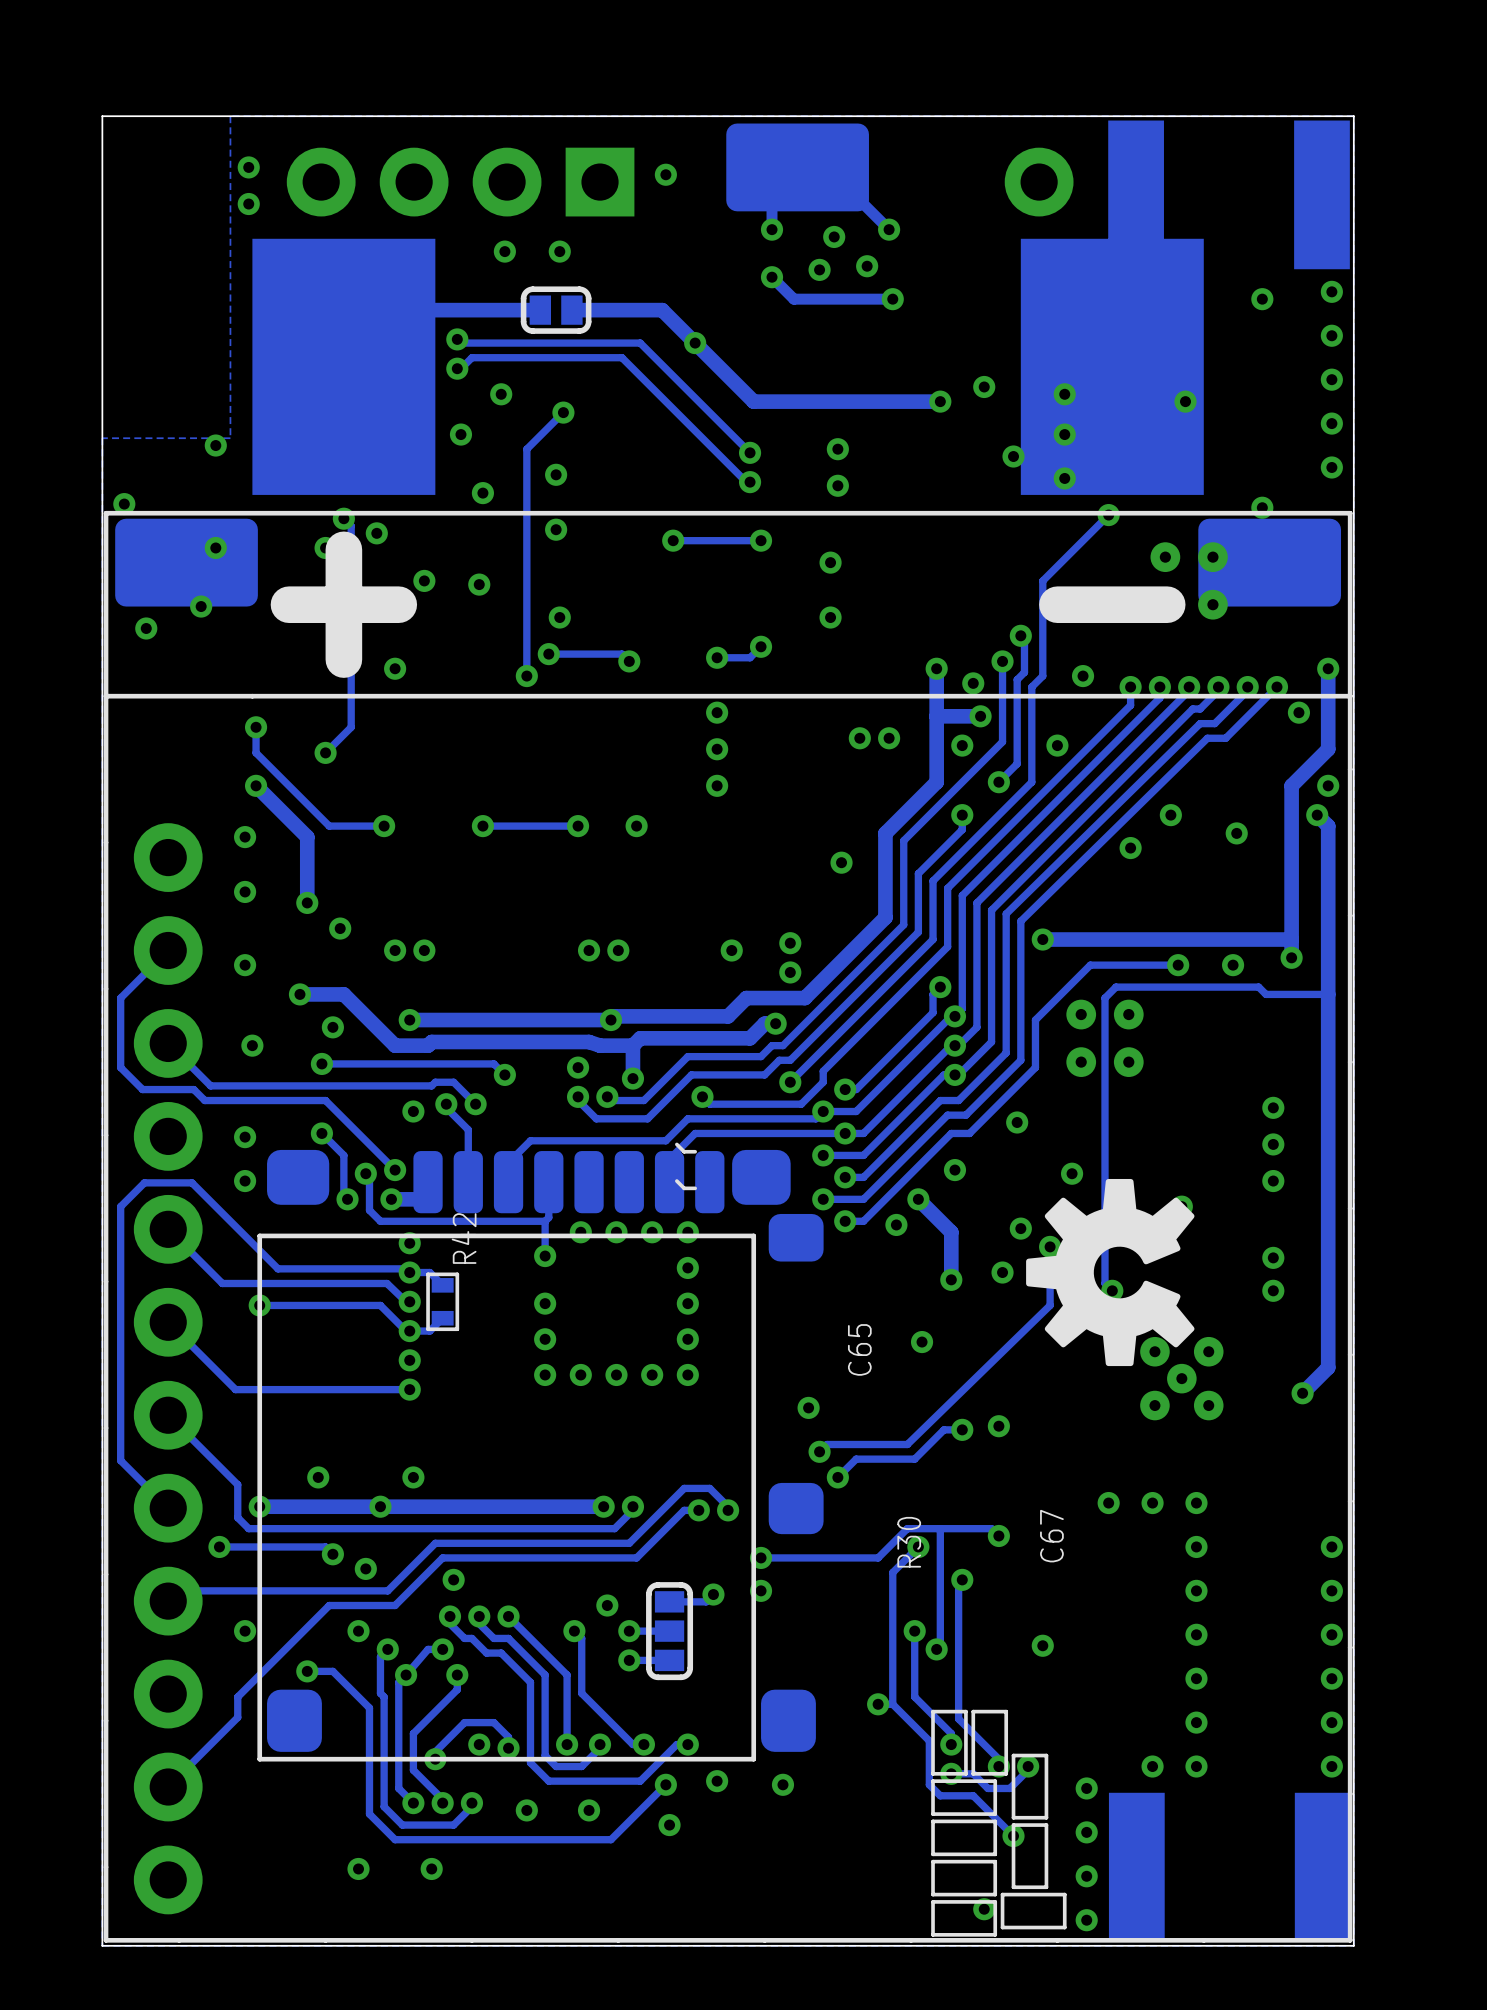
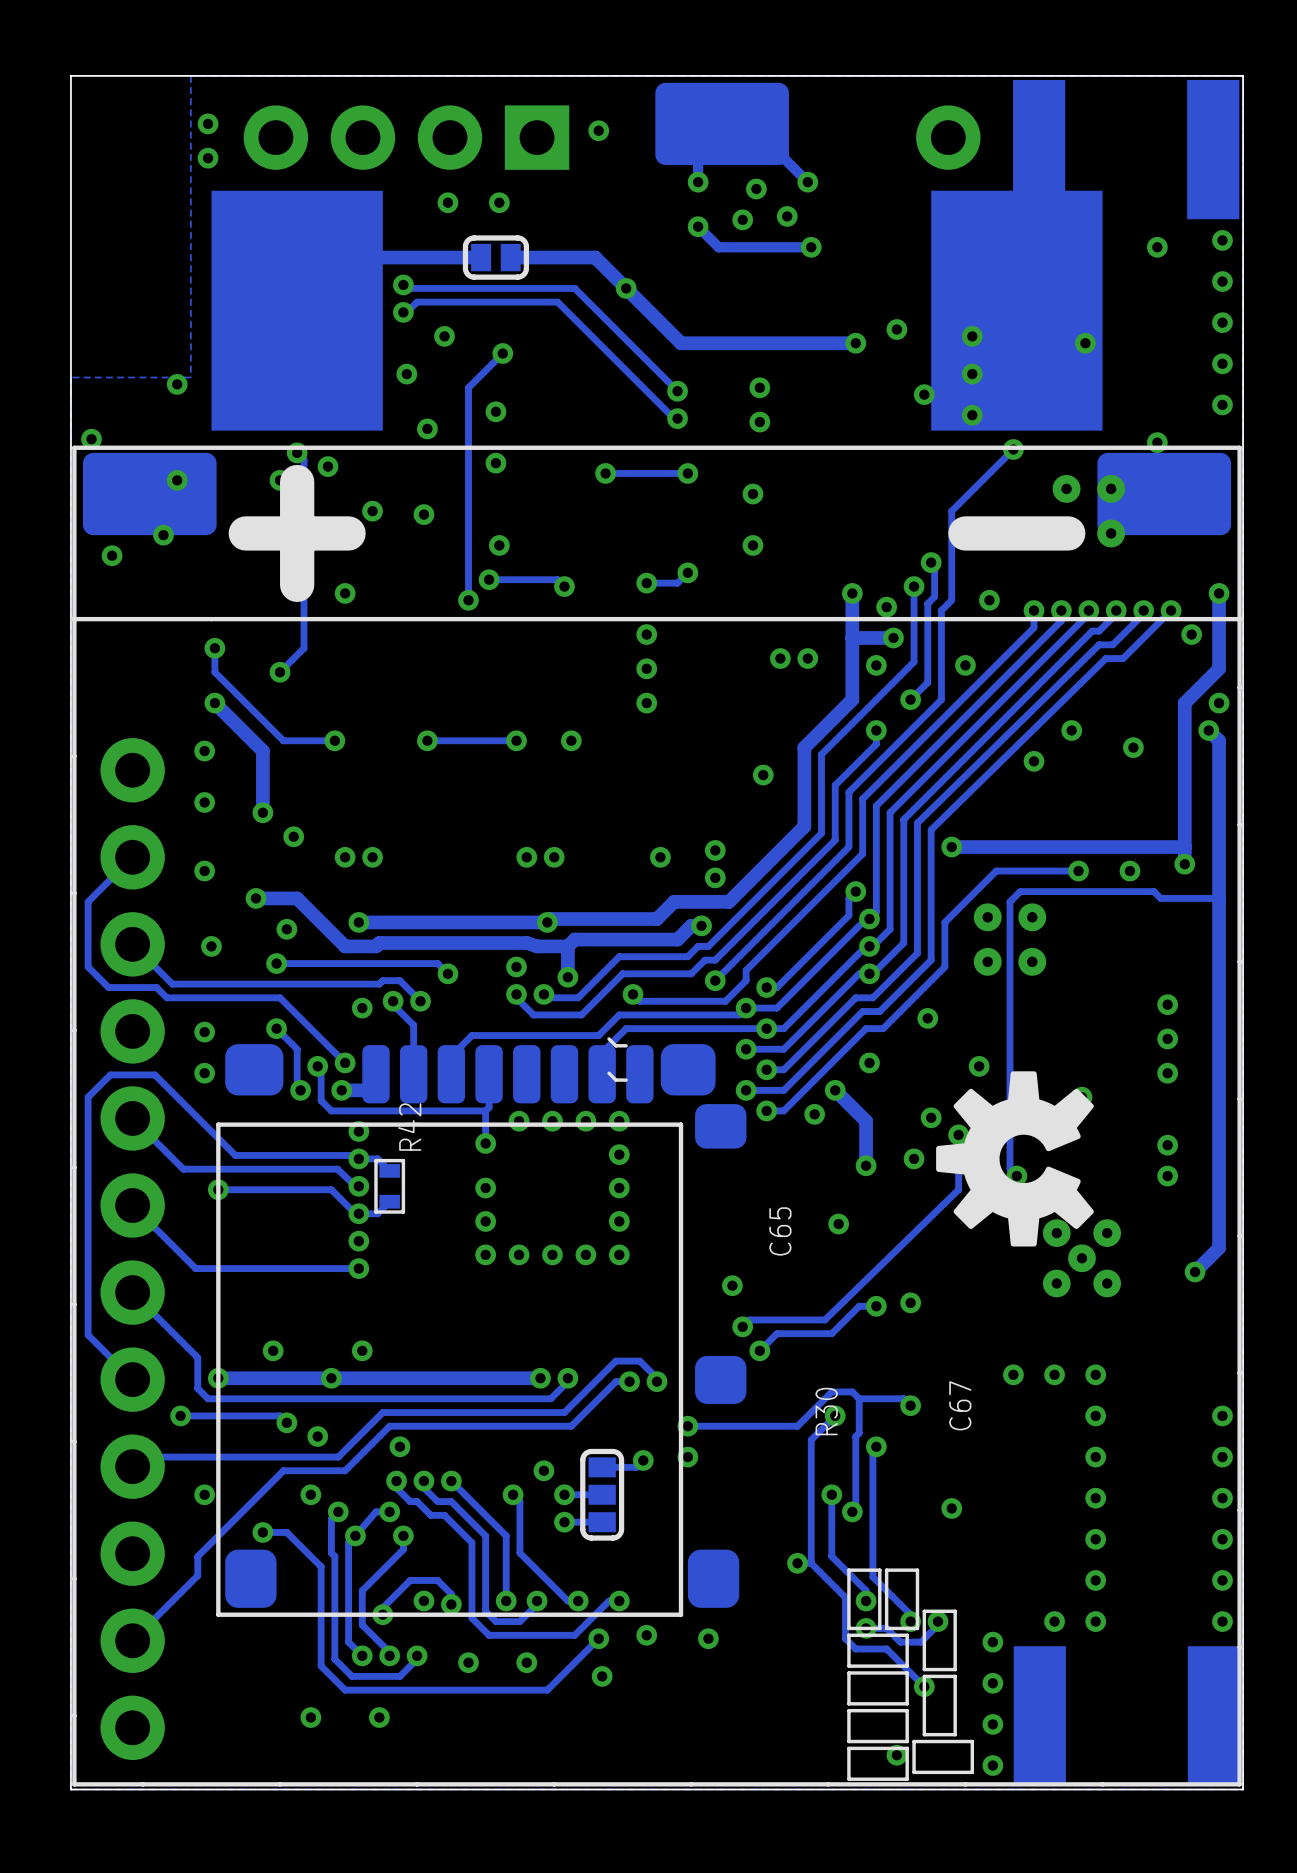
track: (940, 1528) (940, 1568) -> (824, 1398) (831, 1391) (852, 1391) (859, 1398) (859, 1433) (855, 1436)
track: (943, 1528) (907, 1528) -> none

